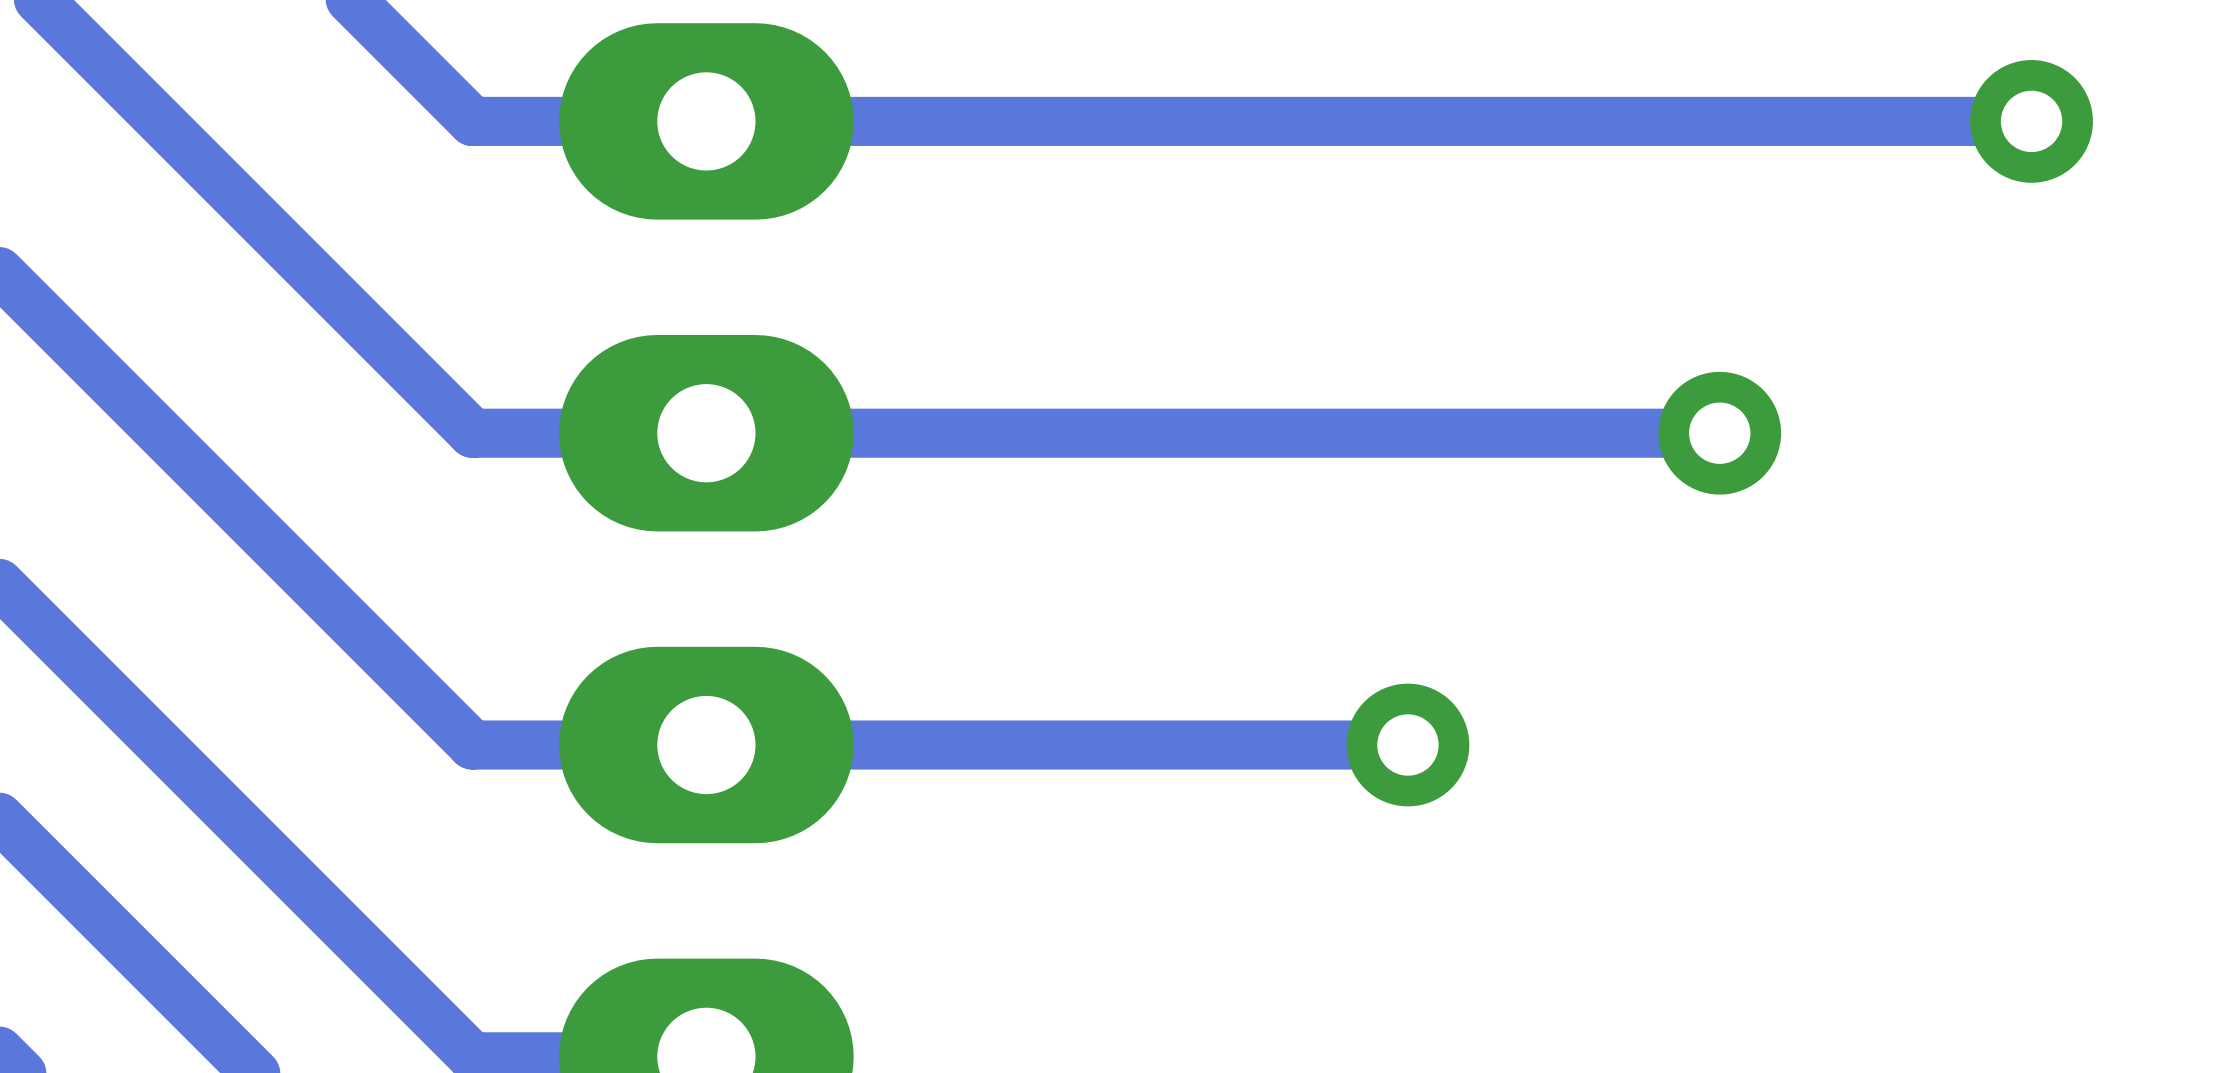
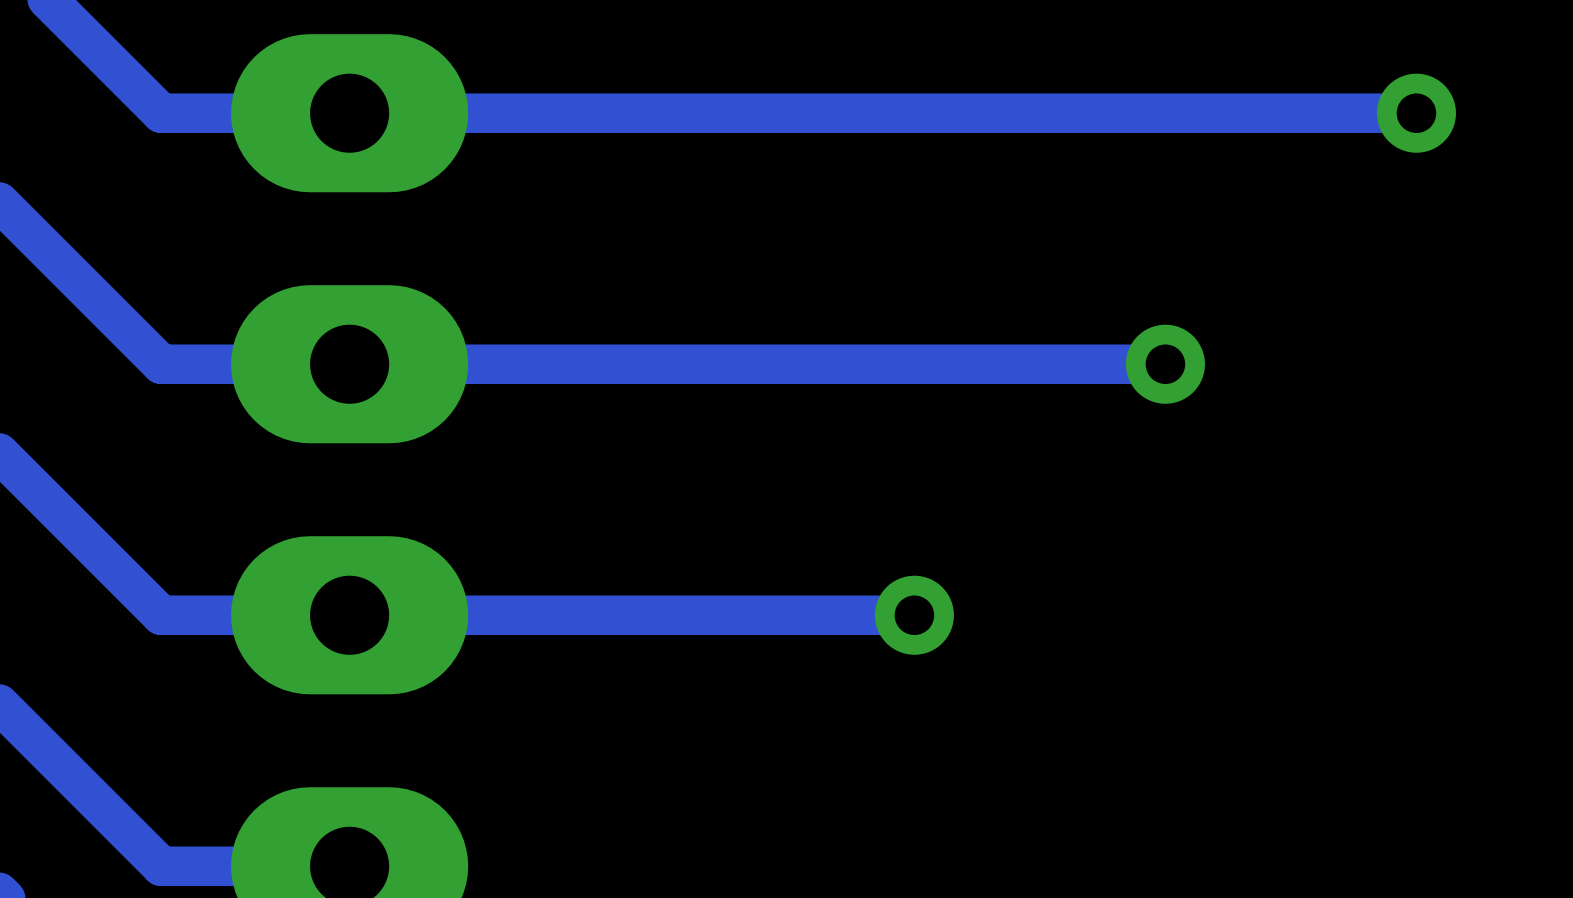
via size: [1970, 60, 2093, 183] -> [1376, 73, 1456, 153]
via size: [1658, 371, 1782, 495] -> [1125, 324, 1205, 404]
via size: [1346, 683, 1470, 807] -> [874, 575, 954, 655]

